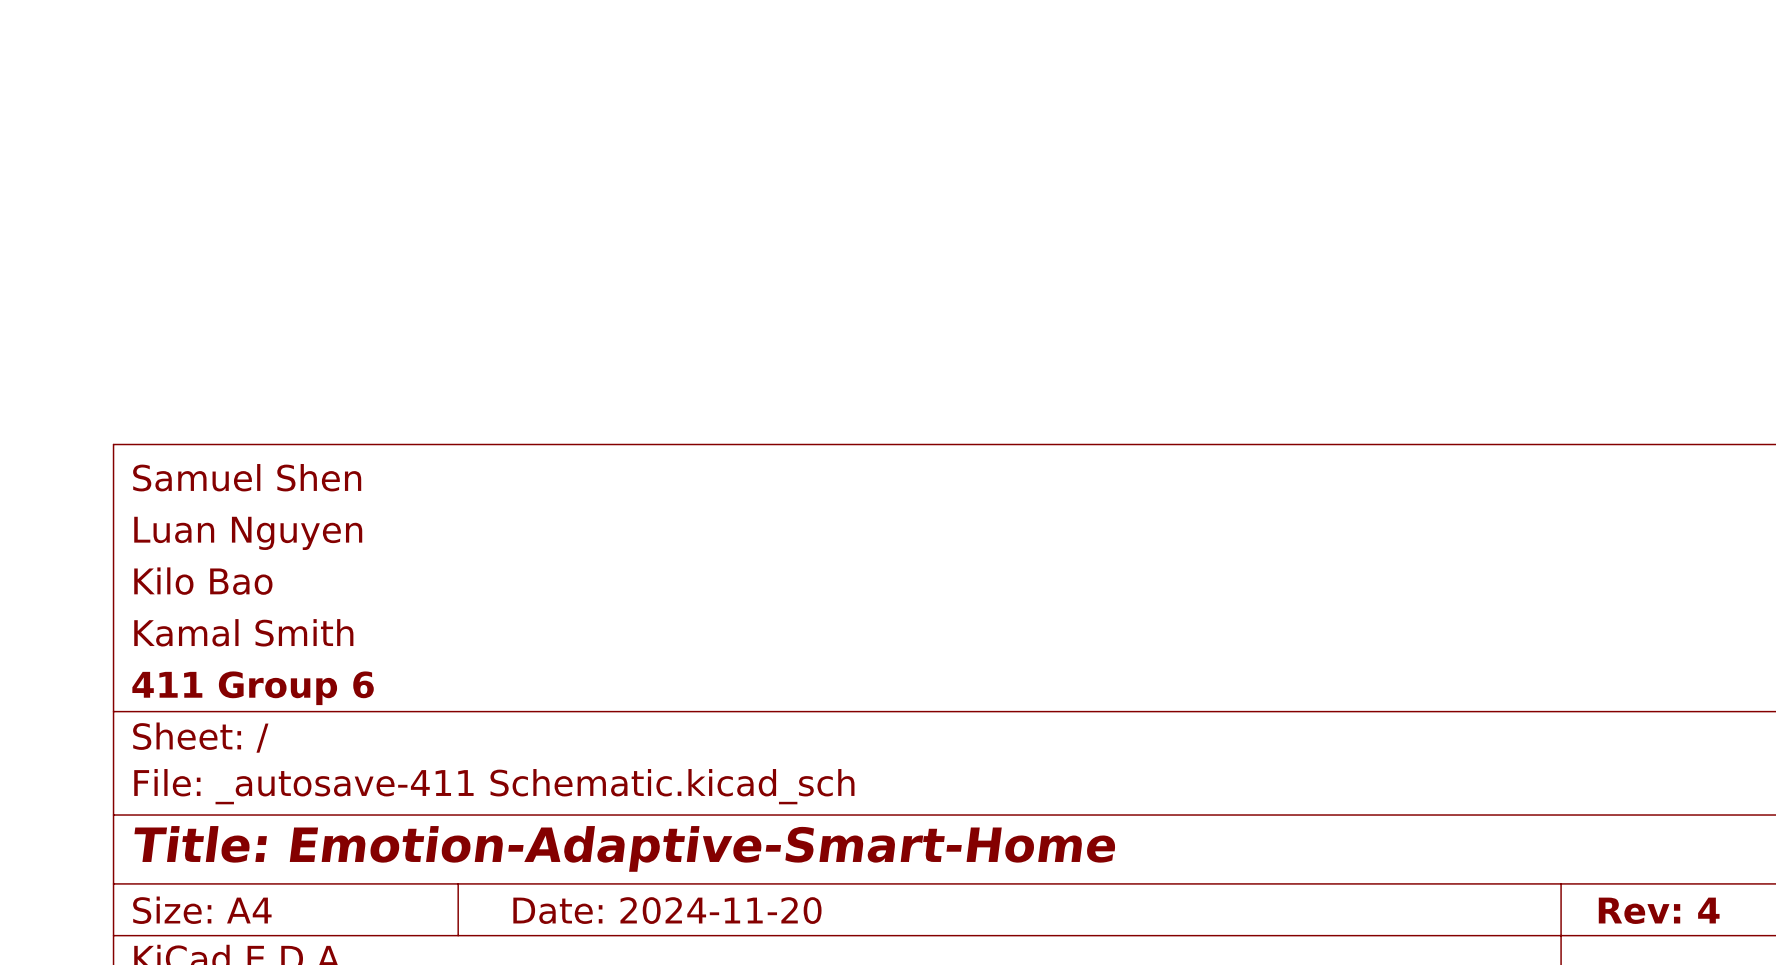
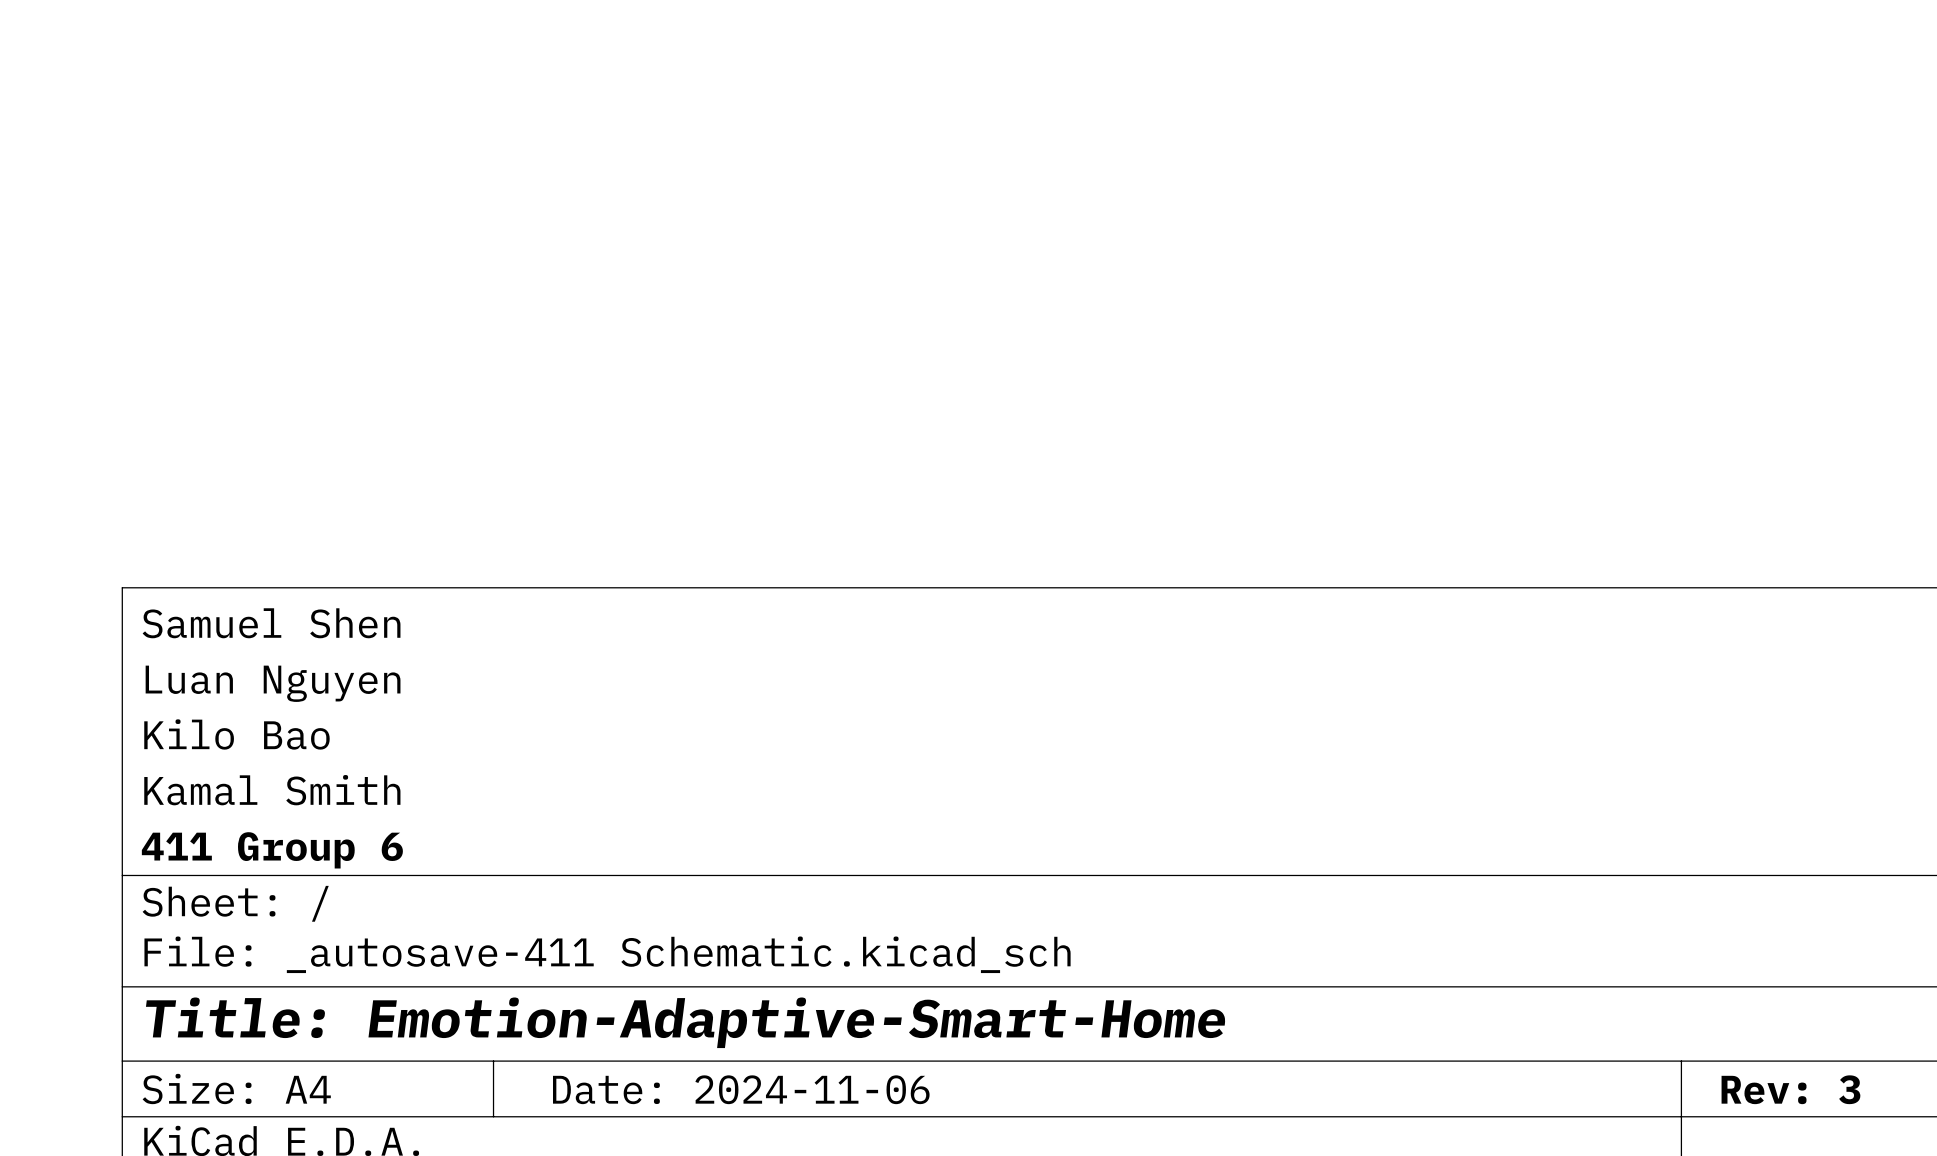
title block: Date: 2024-11-20 (667, 910) -> Date: 2024-11-06 (741, 1089)
title block: Rev: 4 (1659, 910) -> Rev: 3 (1790, 1089)

